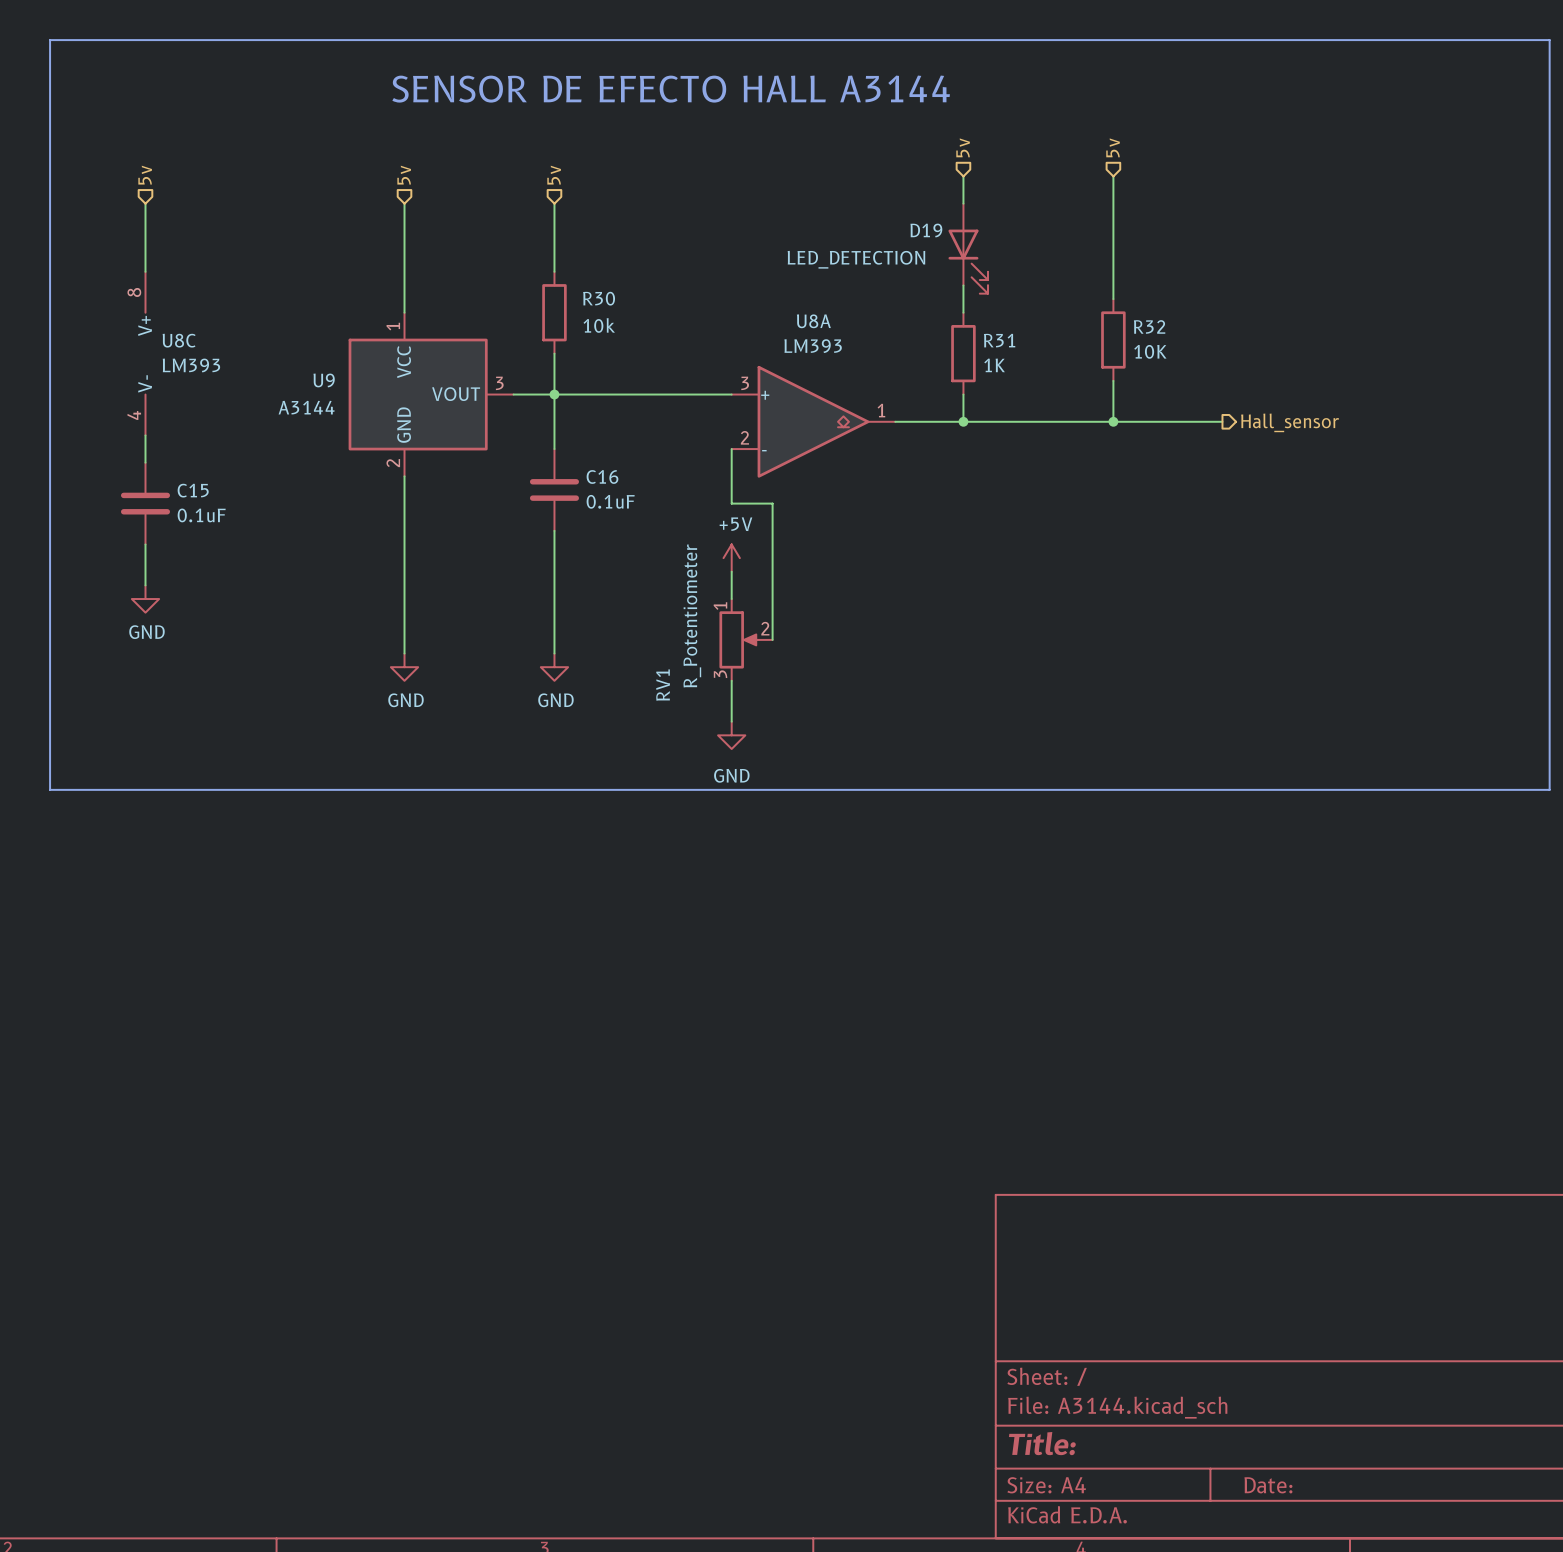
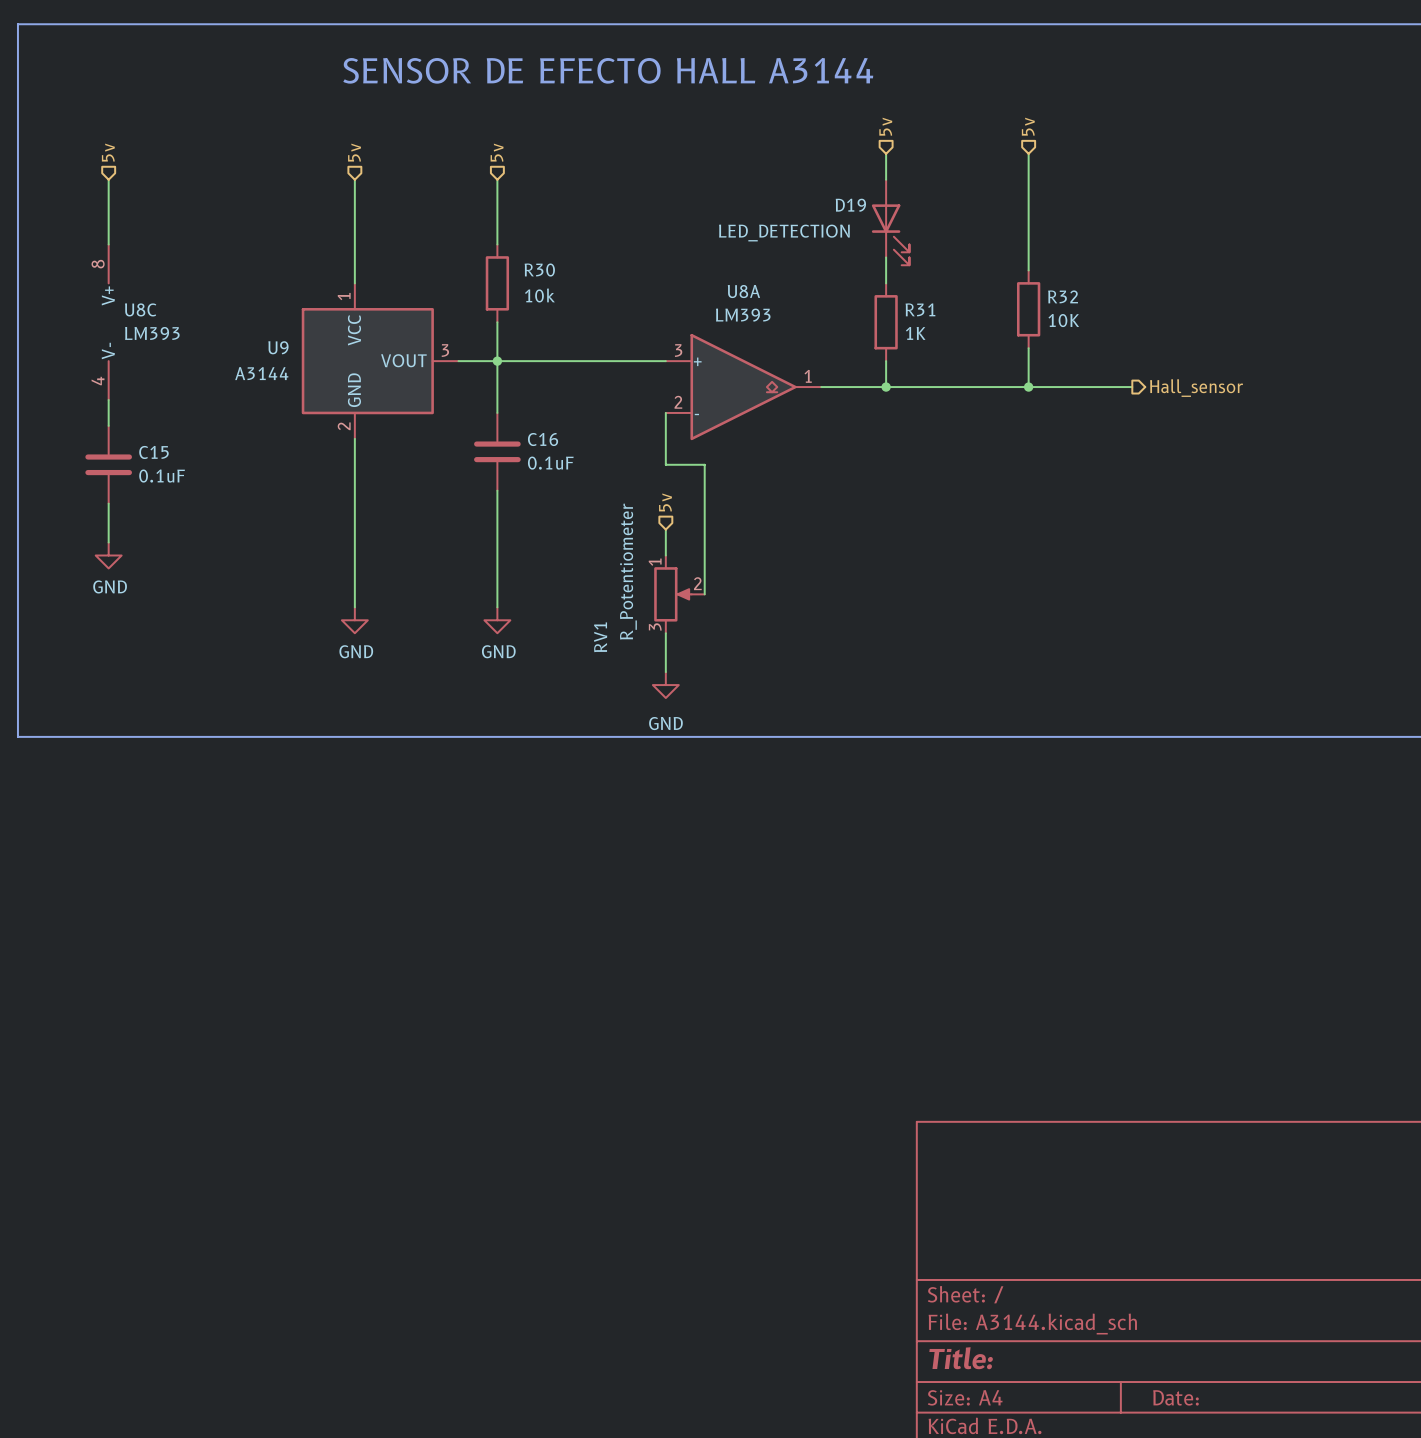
hierarchical label: none -> 5v (665, 502)
power symbol: +5V (731, 558) -> none

